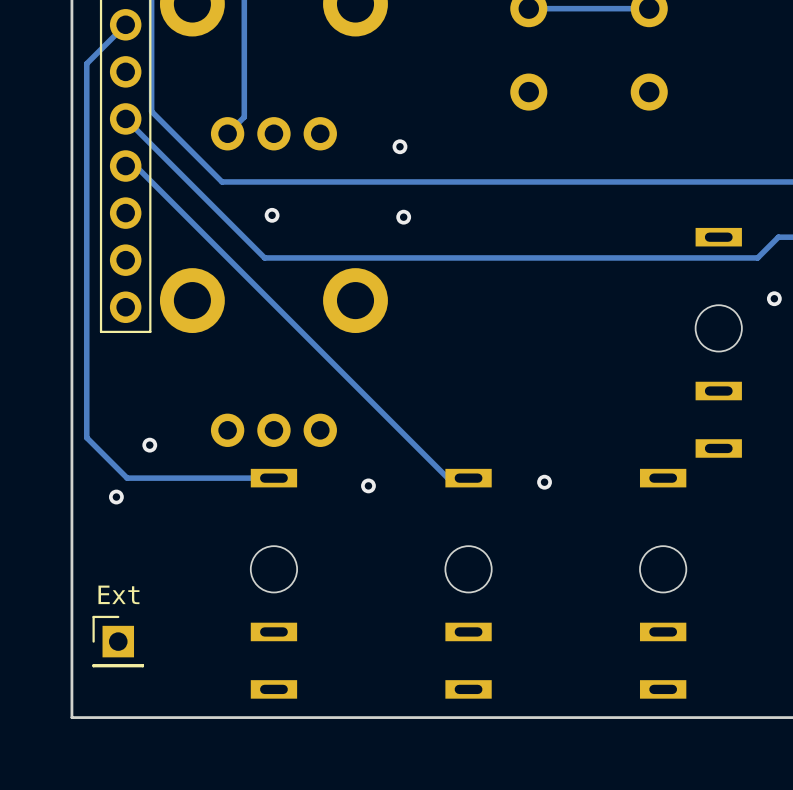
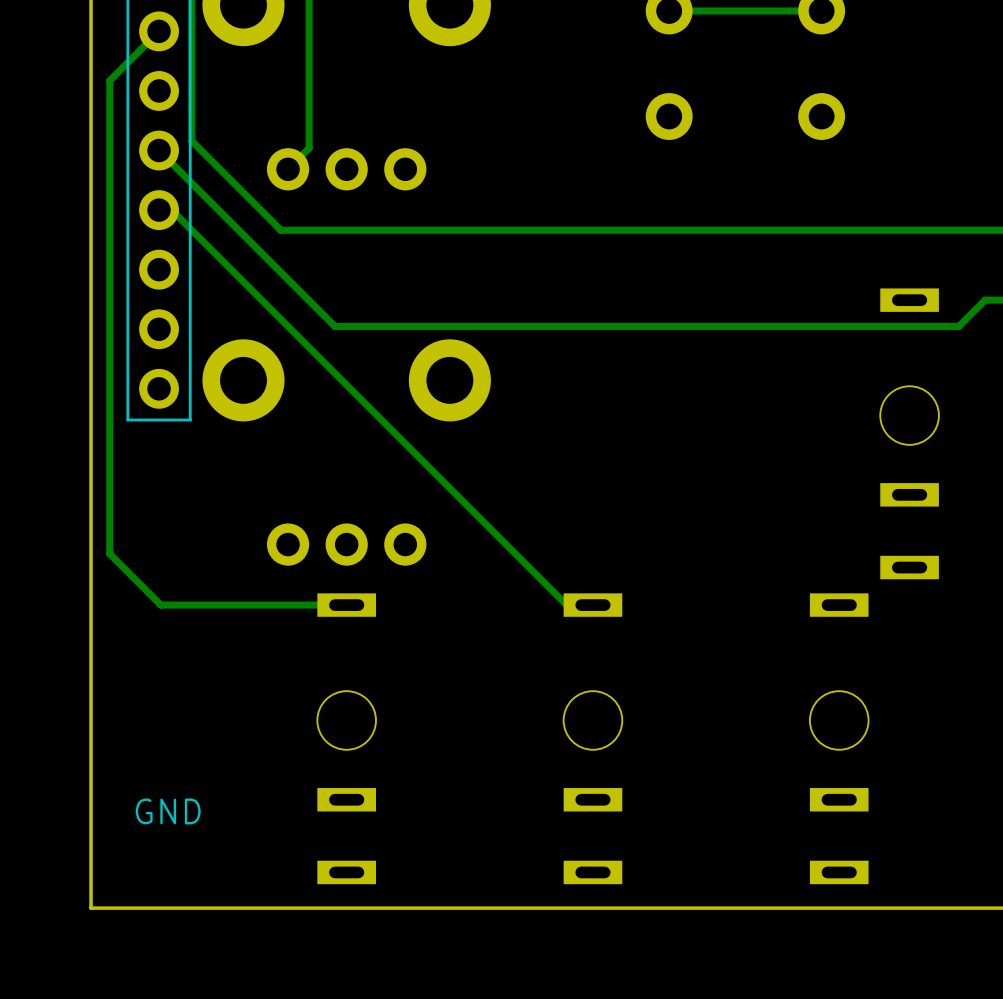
via: (399, 146) -> none
via: (272, 215) -> none
via: (403, 217) -> none
via: (774, 298) -> none
via: (149, 445) -> none
via: (544, 482) -> none
via: (368, 485) -> none
via: (116, 497) -> none
text: Ext (118, 594) -> none
part: (118, 641) -> none
text: none -> GND (168, 811)

